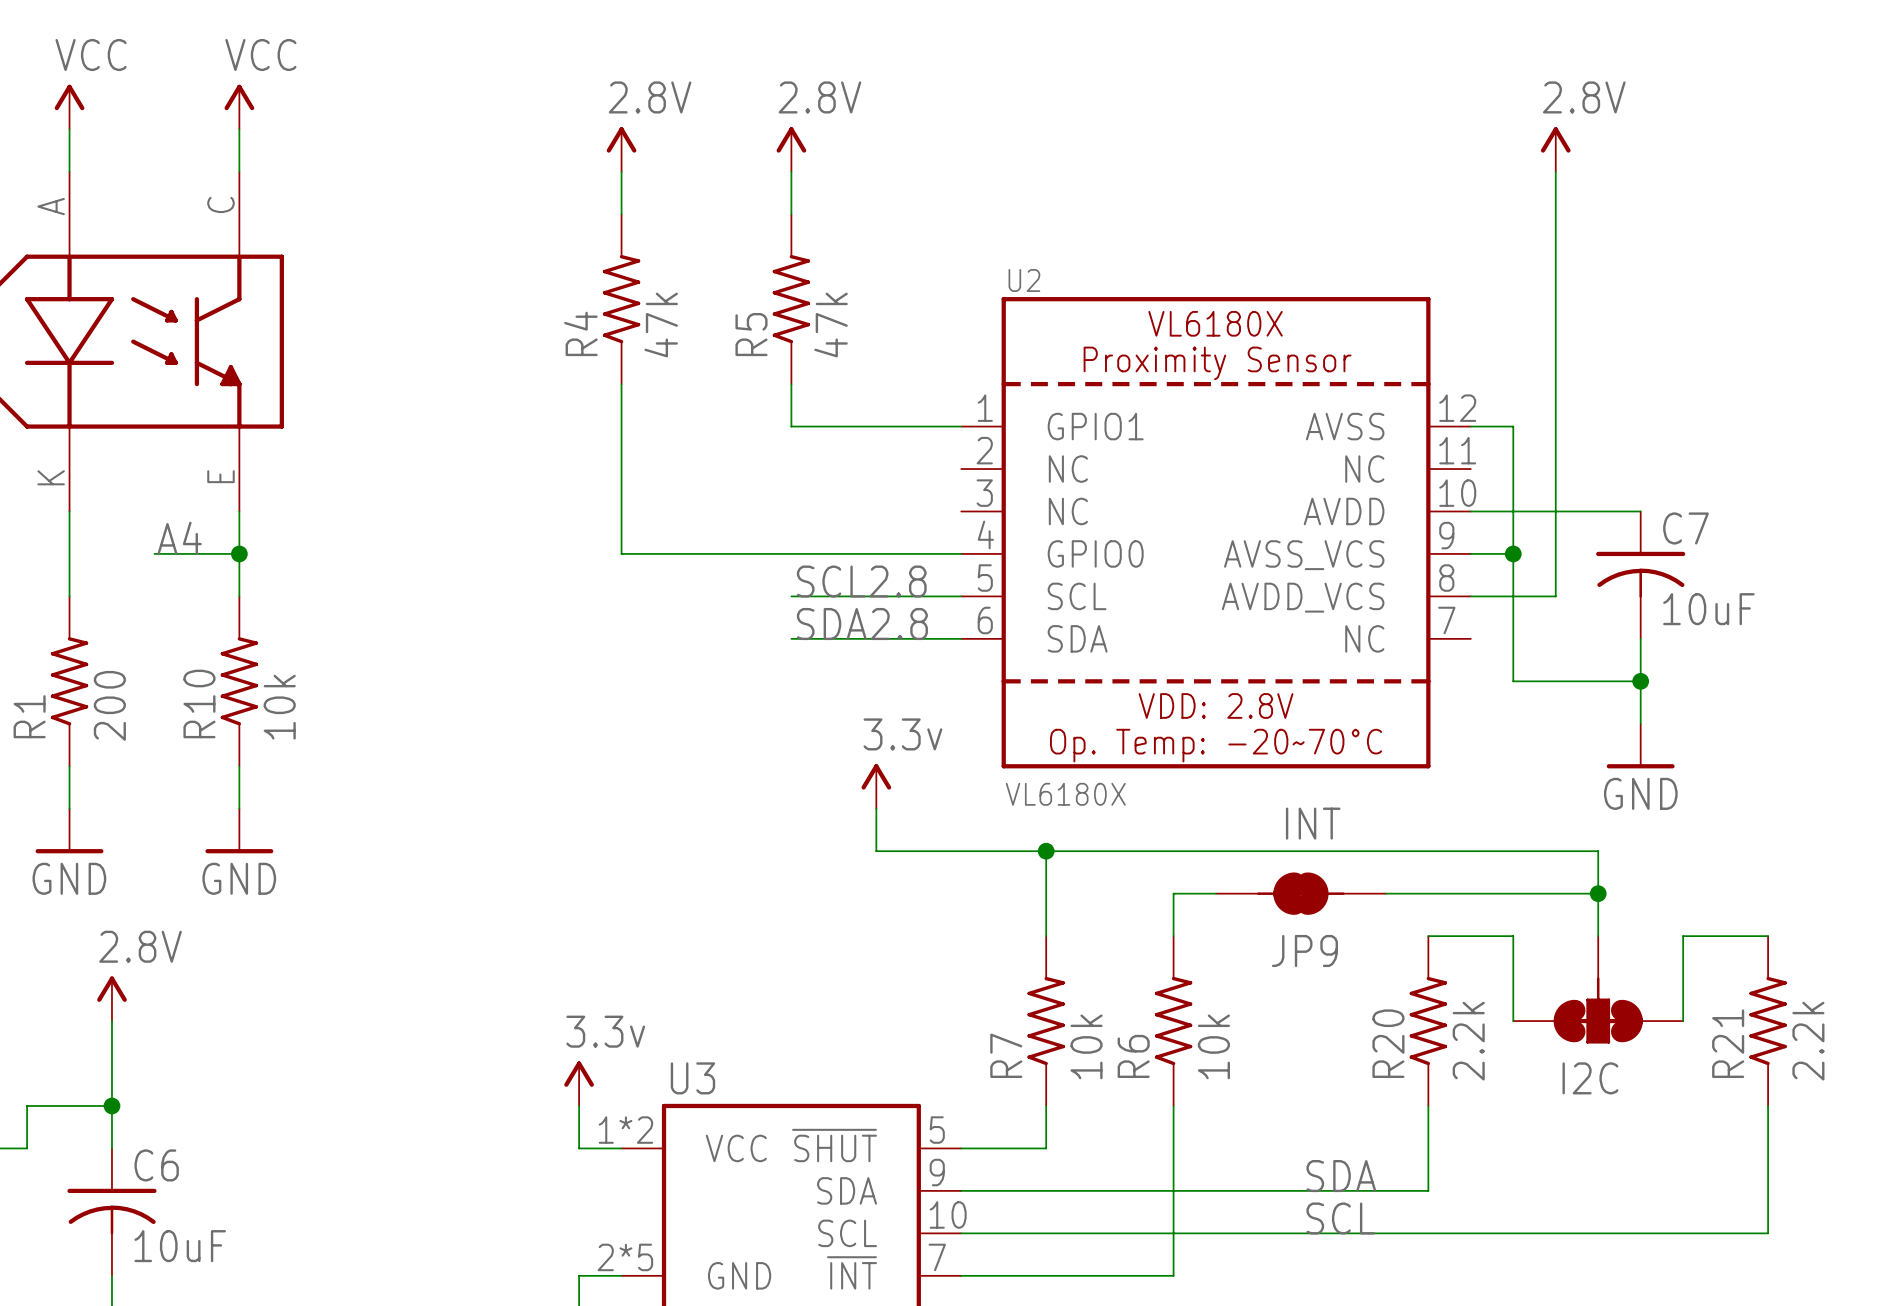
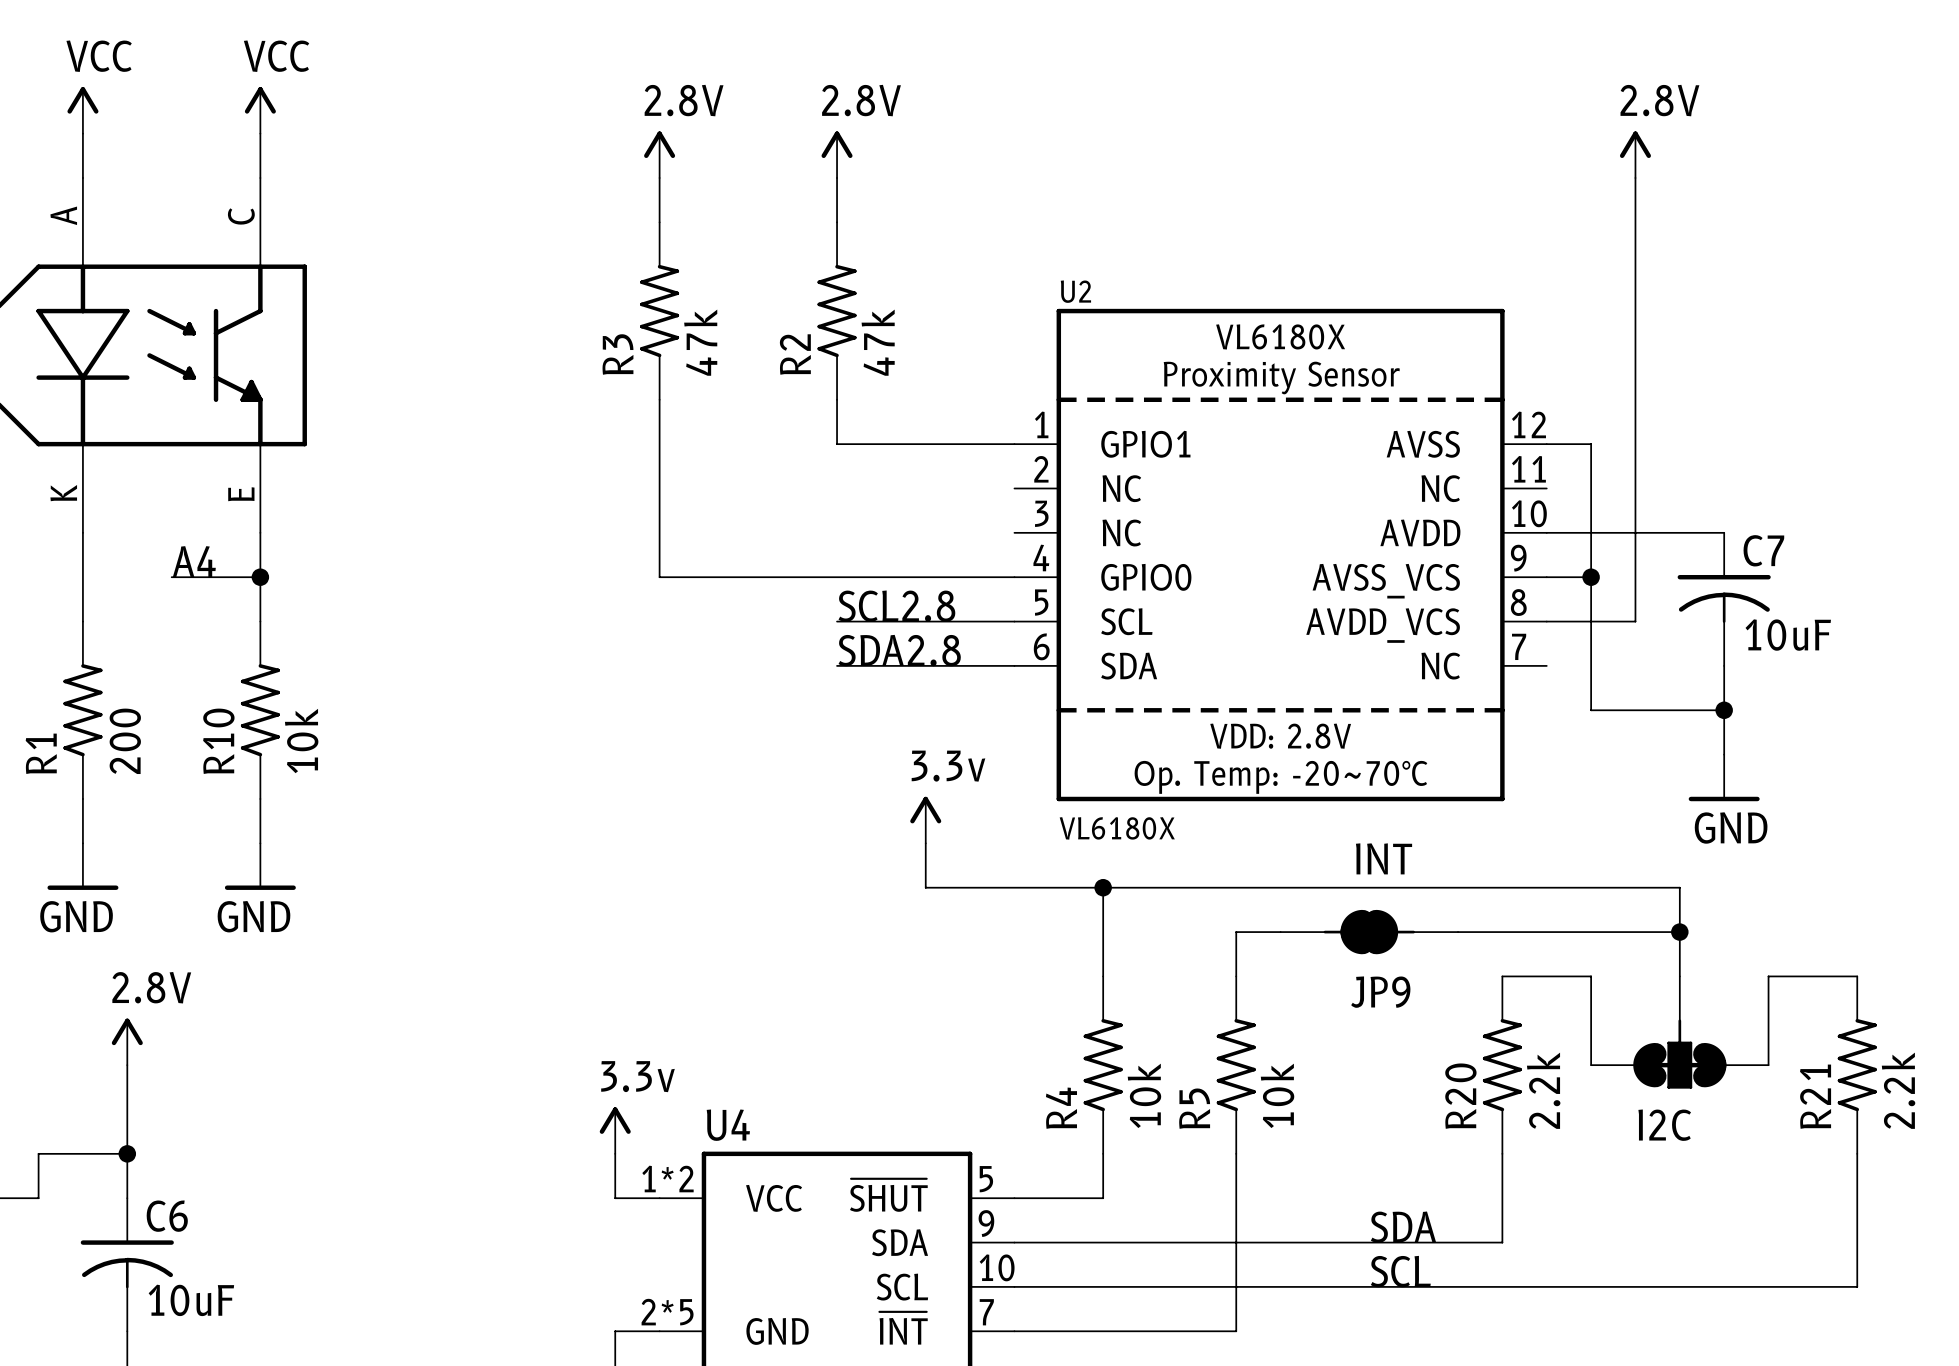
R4 name: R4 (580, 333) -> R3 (617, 354)
R5 name: R5 (751, 334) -> R2 (795, 354)
R7 name: R7 (1006, 1055) -> R4 (1061, 1108)
R6 name: R6 (1133, 1056) -> R5 (1194, 1108)
U3 name: U3 (692, 1078) -> U4 (728, 1125)

